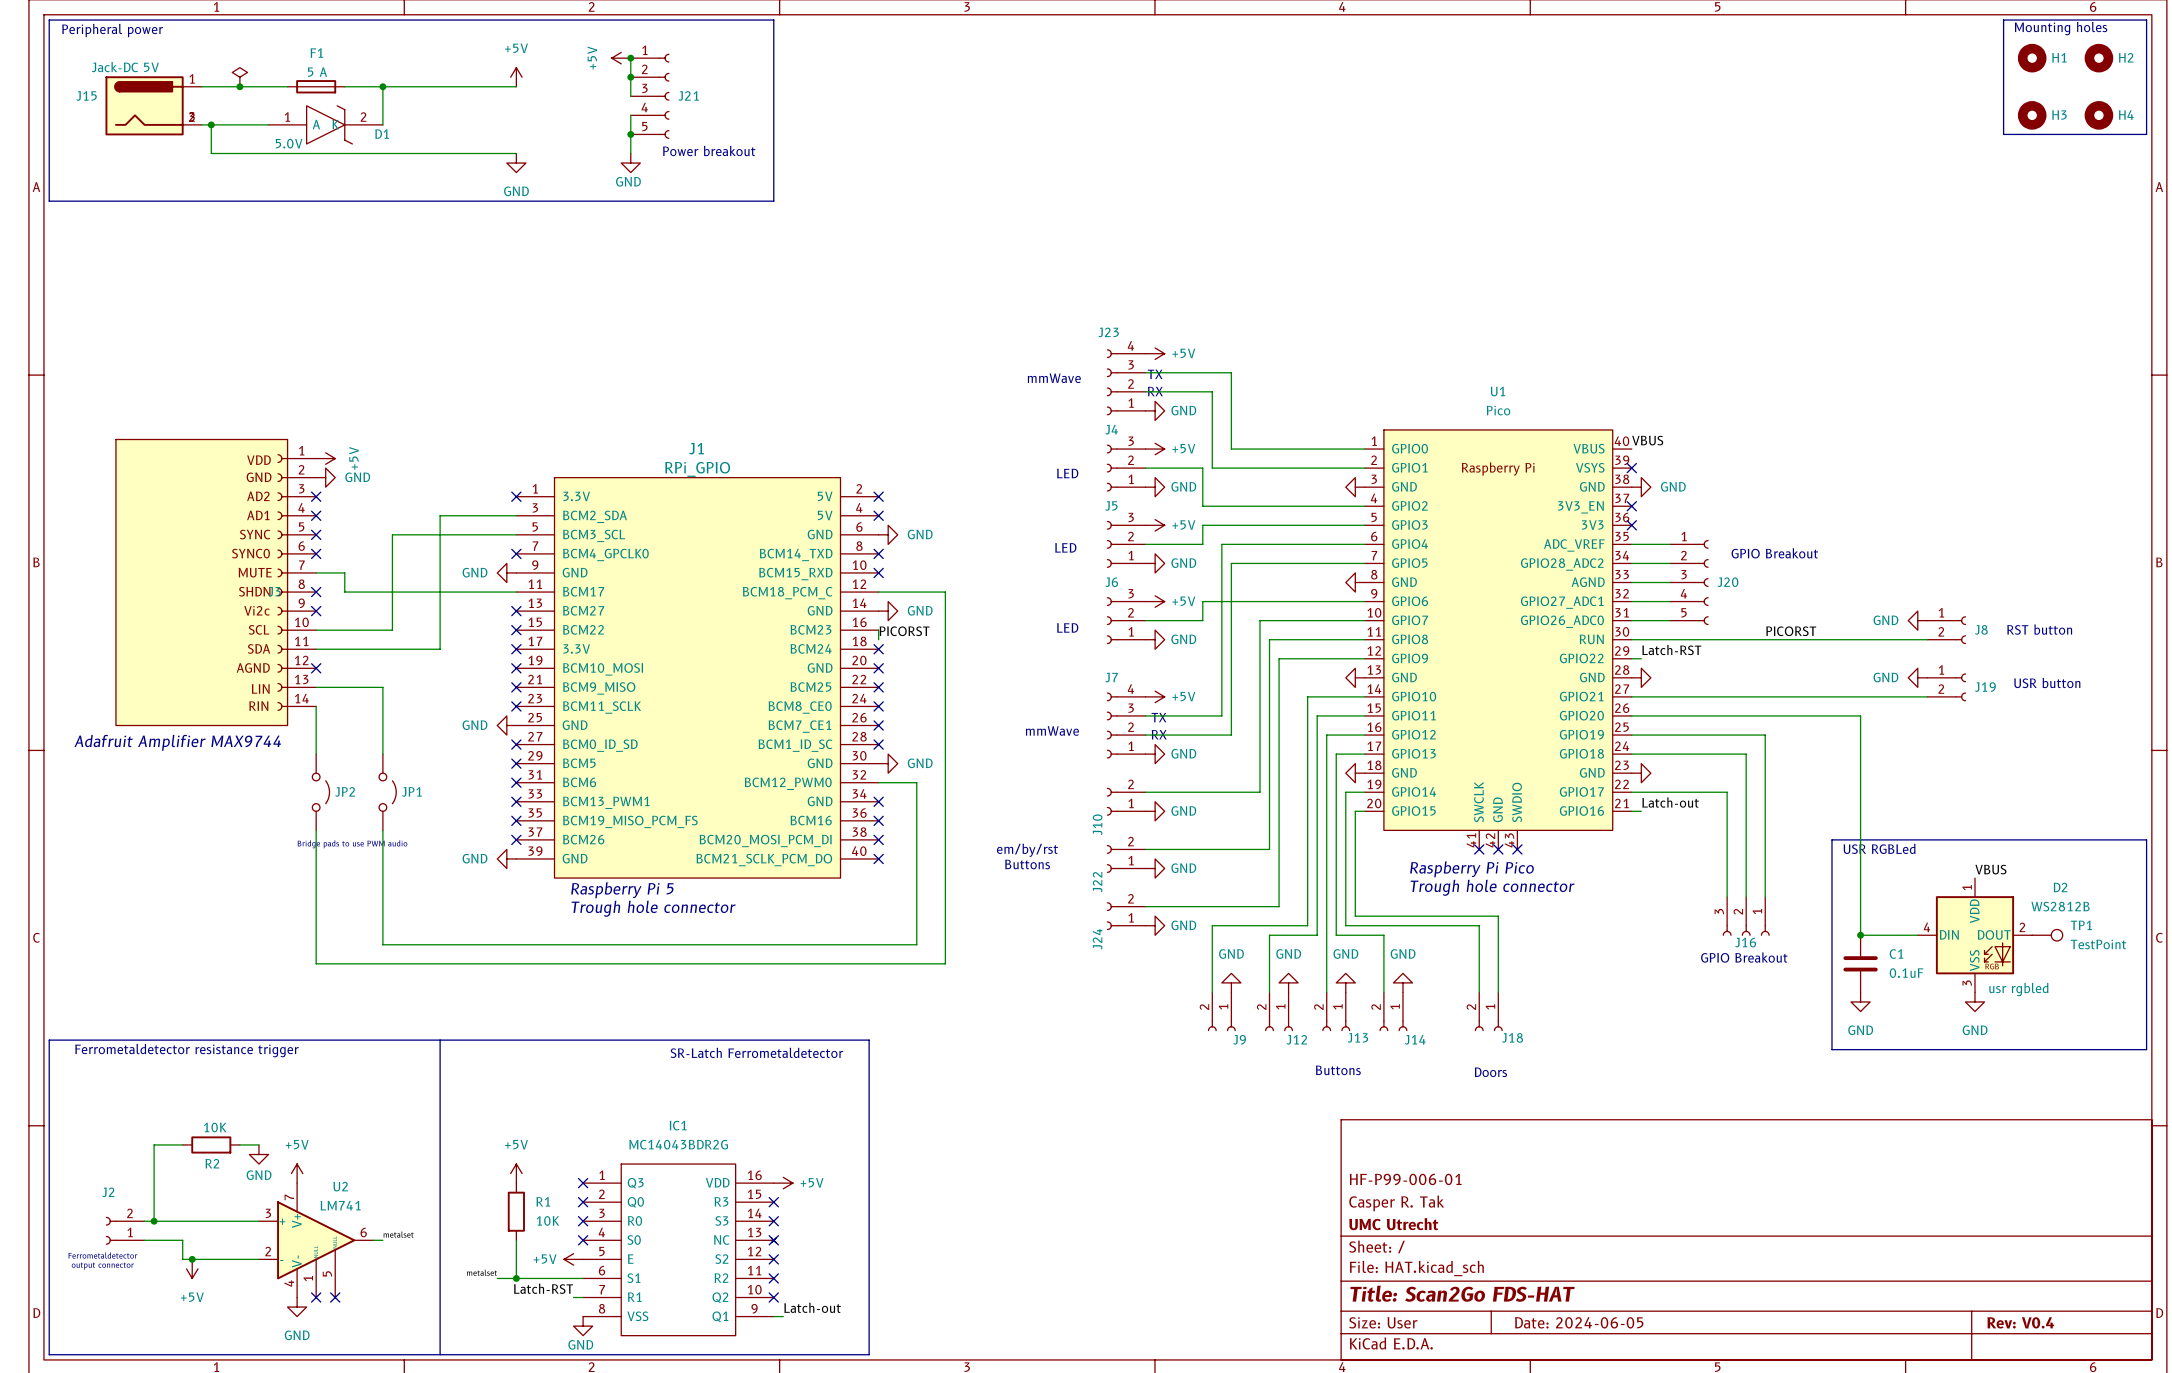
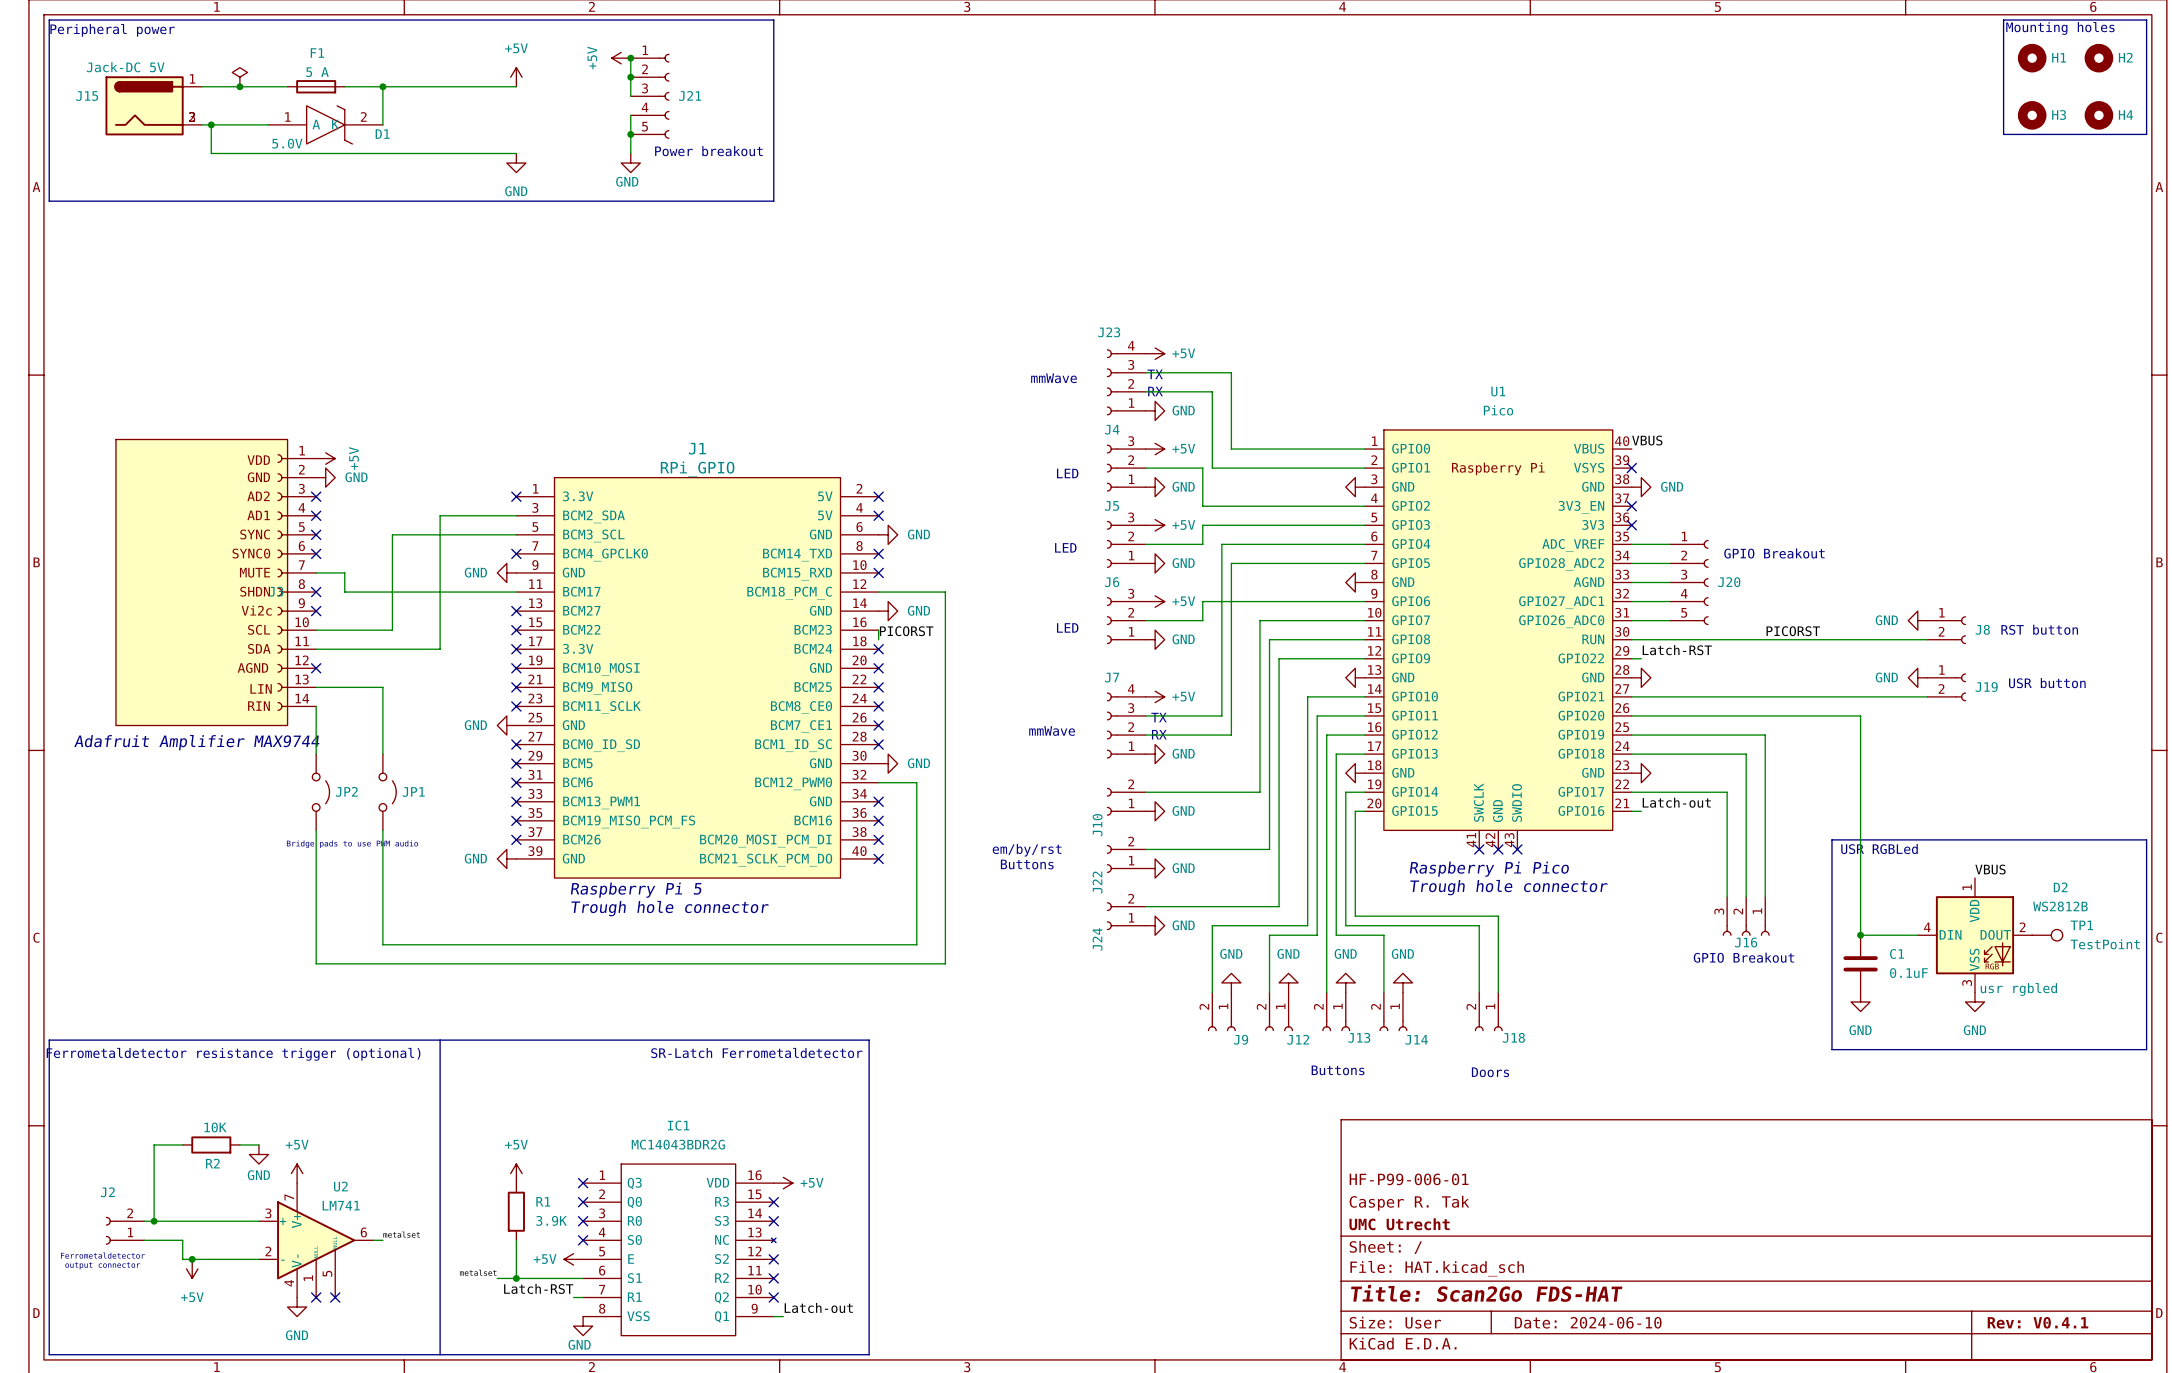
text: Ferrometaldetector resistance trigger (187, 1050) -> Ferrometaldetector resistance trigger (optional) (233, 1054)
R1 value: 10K (547, 1220) -> 3.9K (551, 1220)
no-connect mark: (773, 1240) -> none
title block: Date: 2024-06-05 (1579, 1322) -> Date: 2024-06-10 (1588, 1322)
title block: Rev: V0.4 (2020, 1322) -> Rev: V0.4.1 (2037, 1322)

